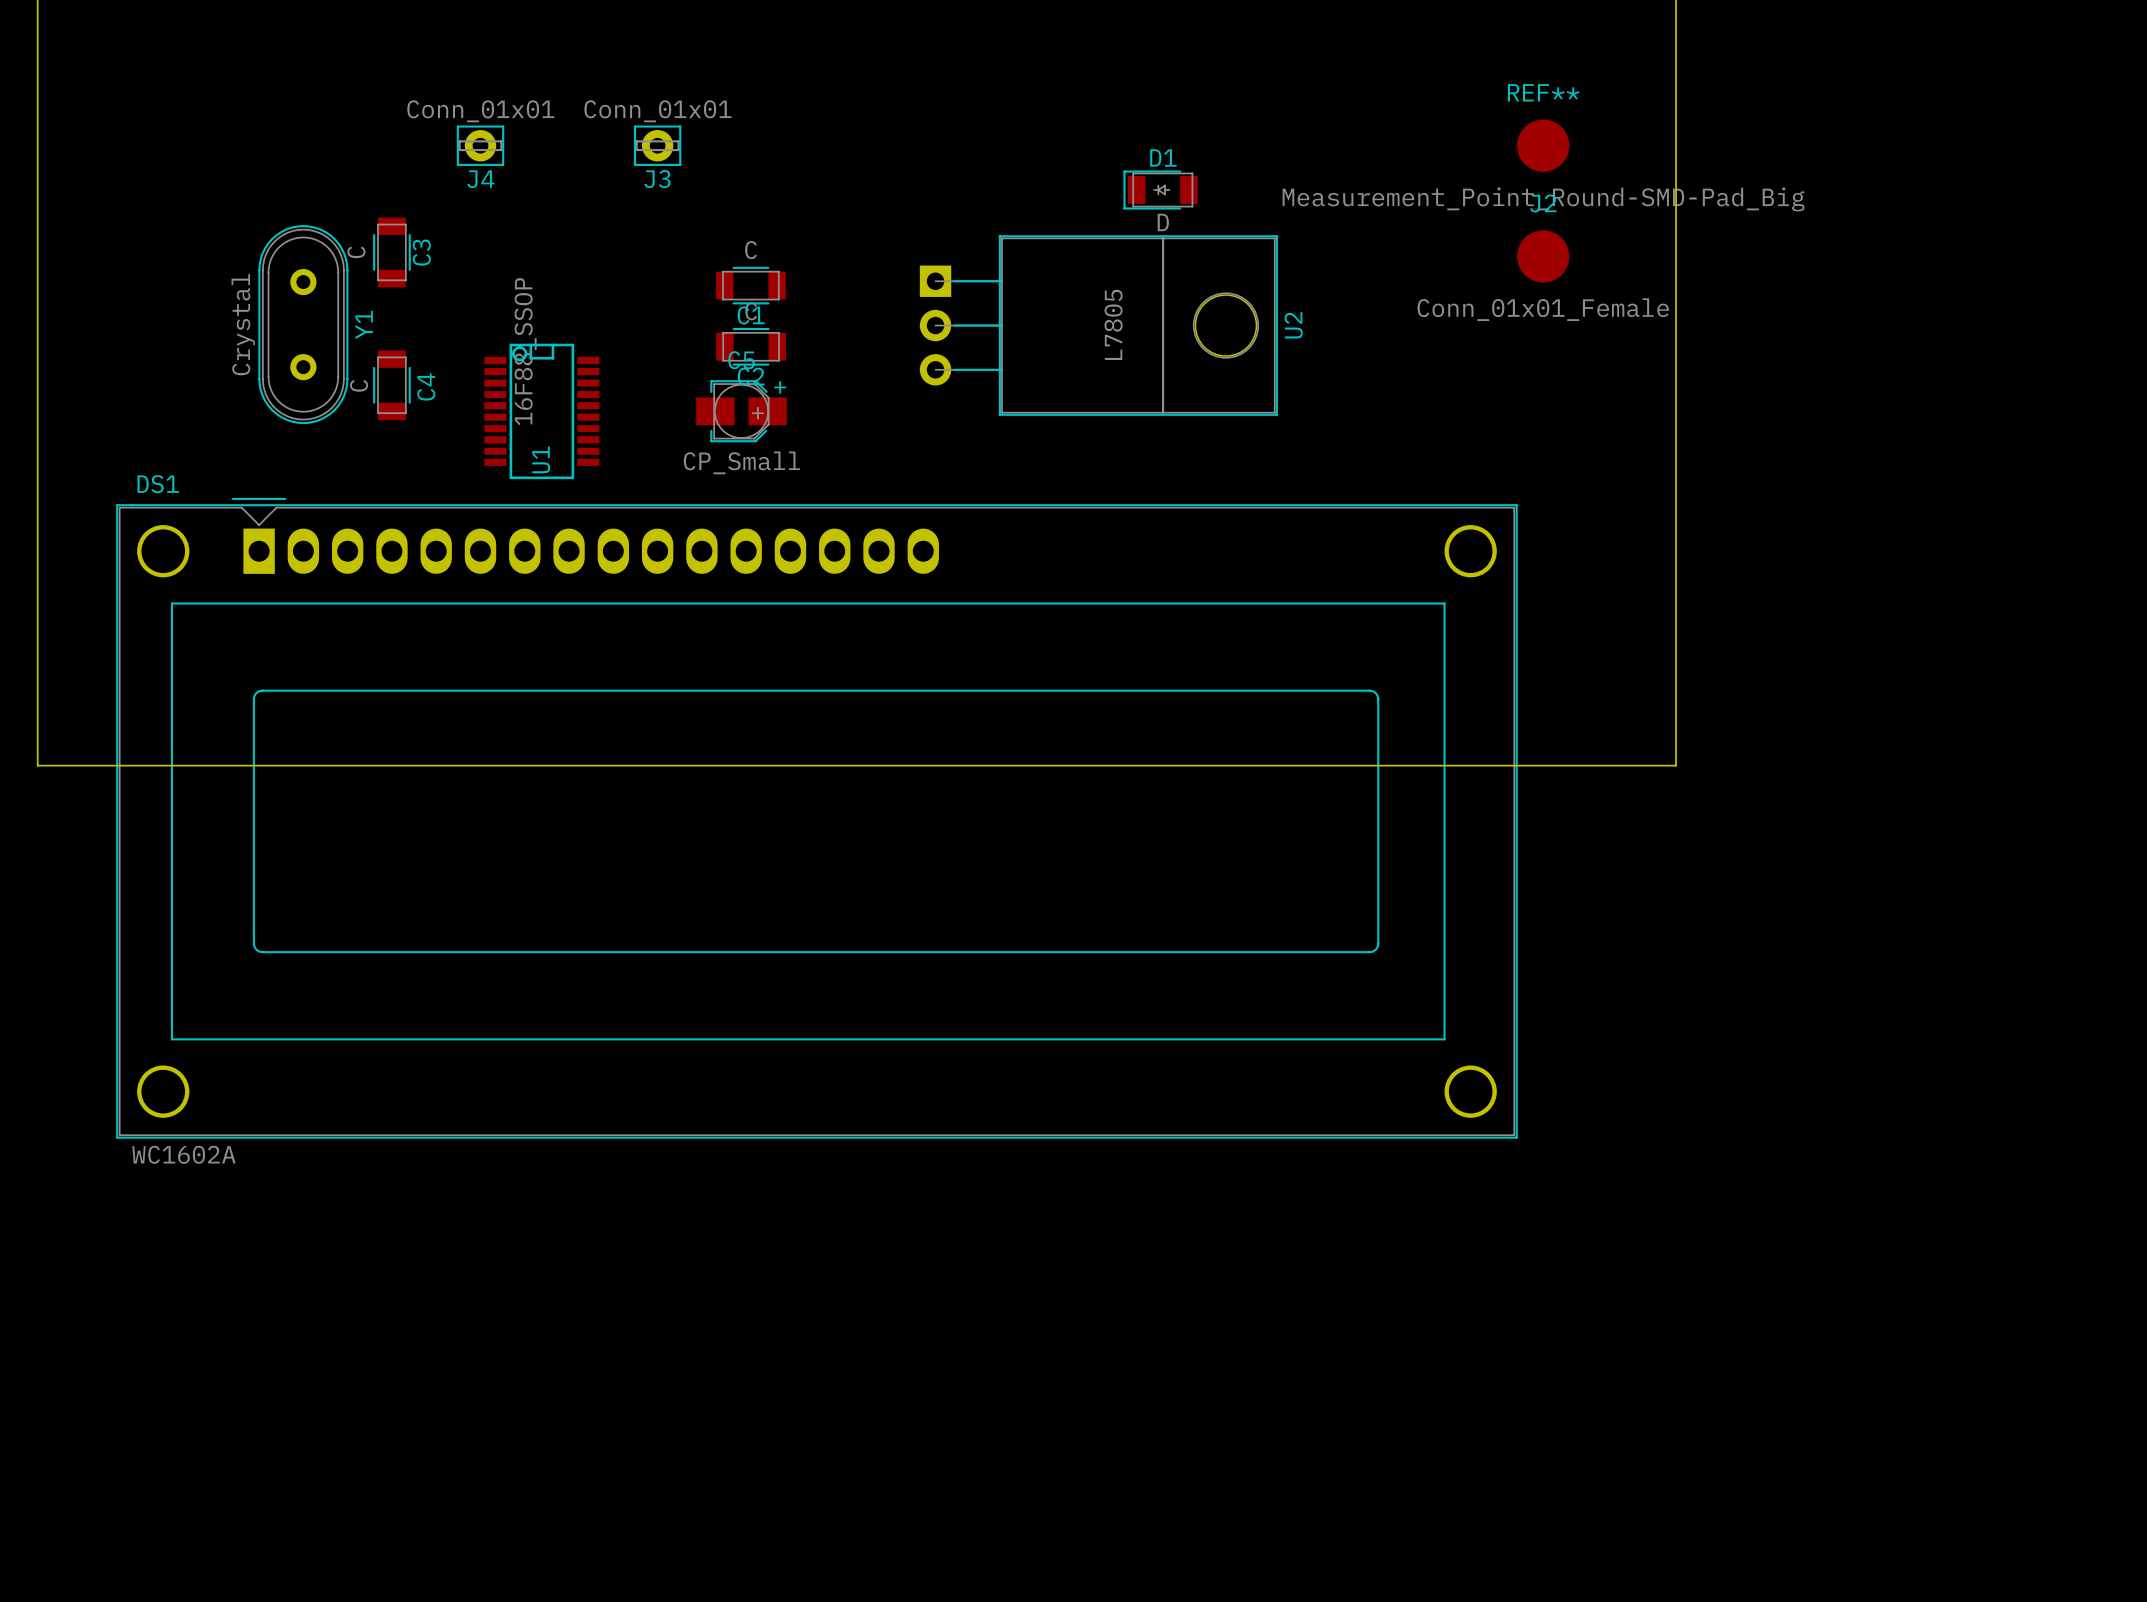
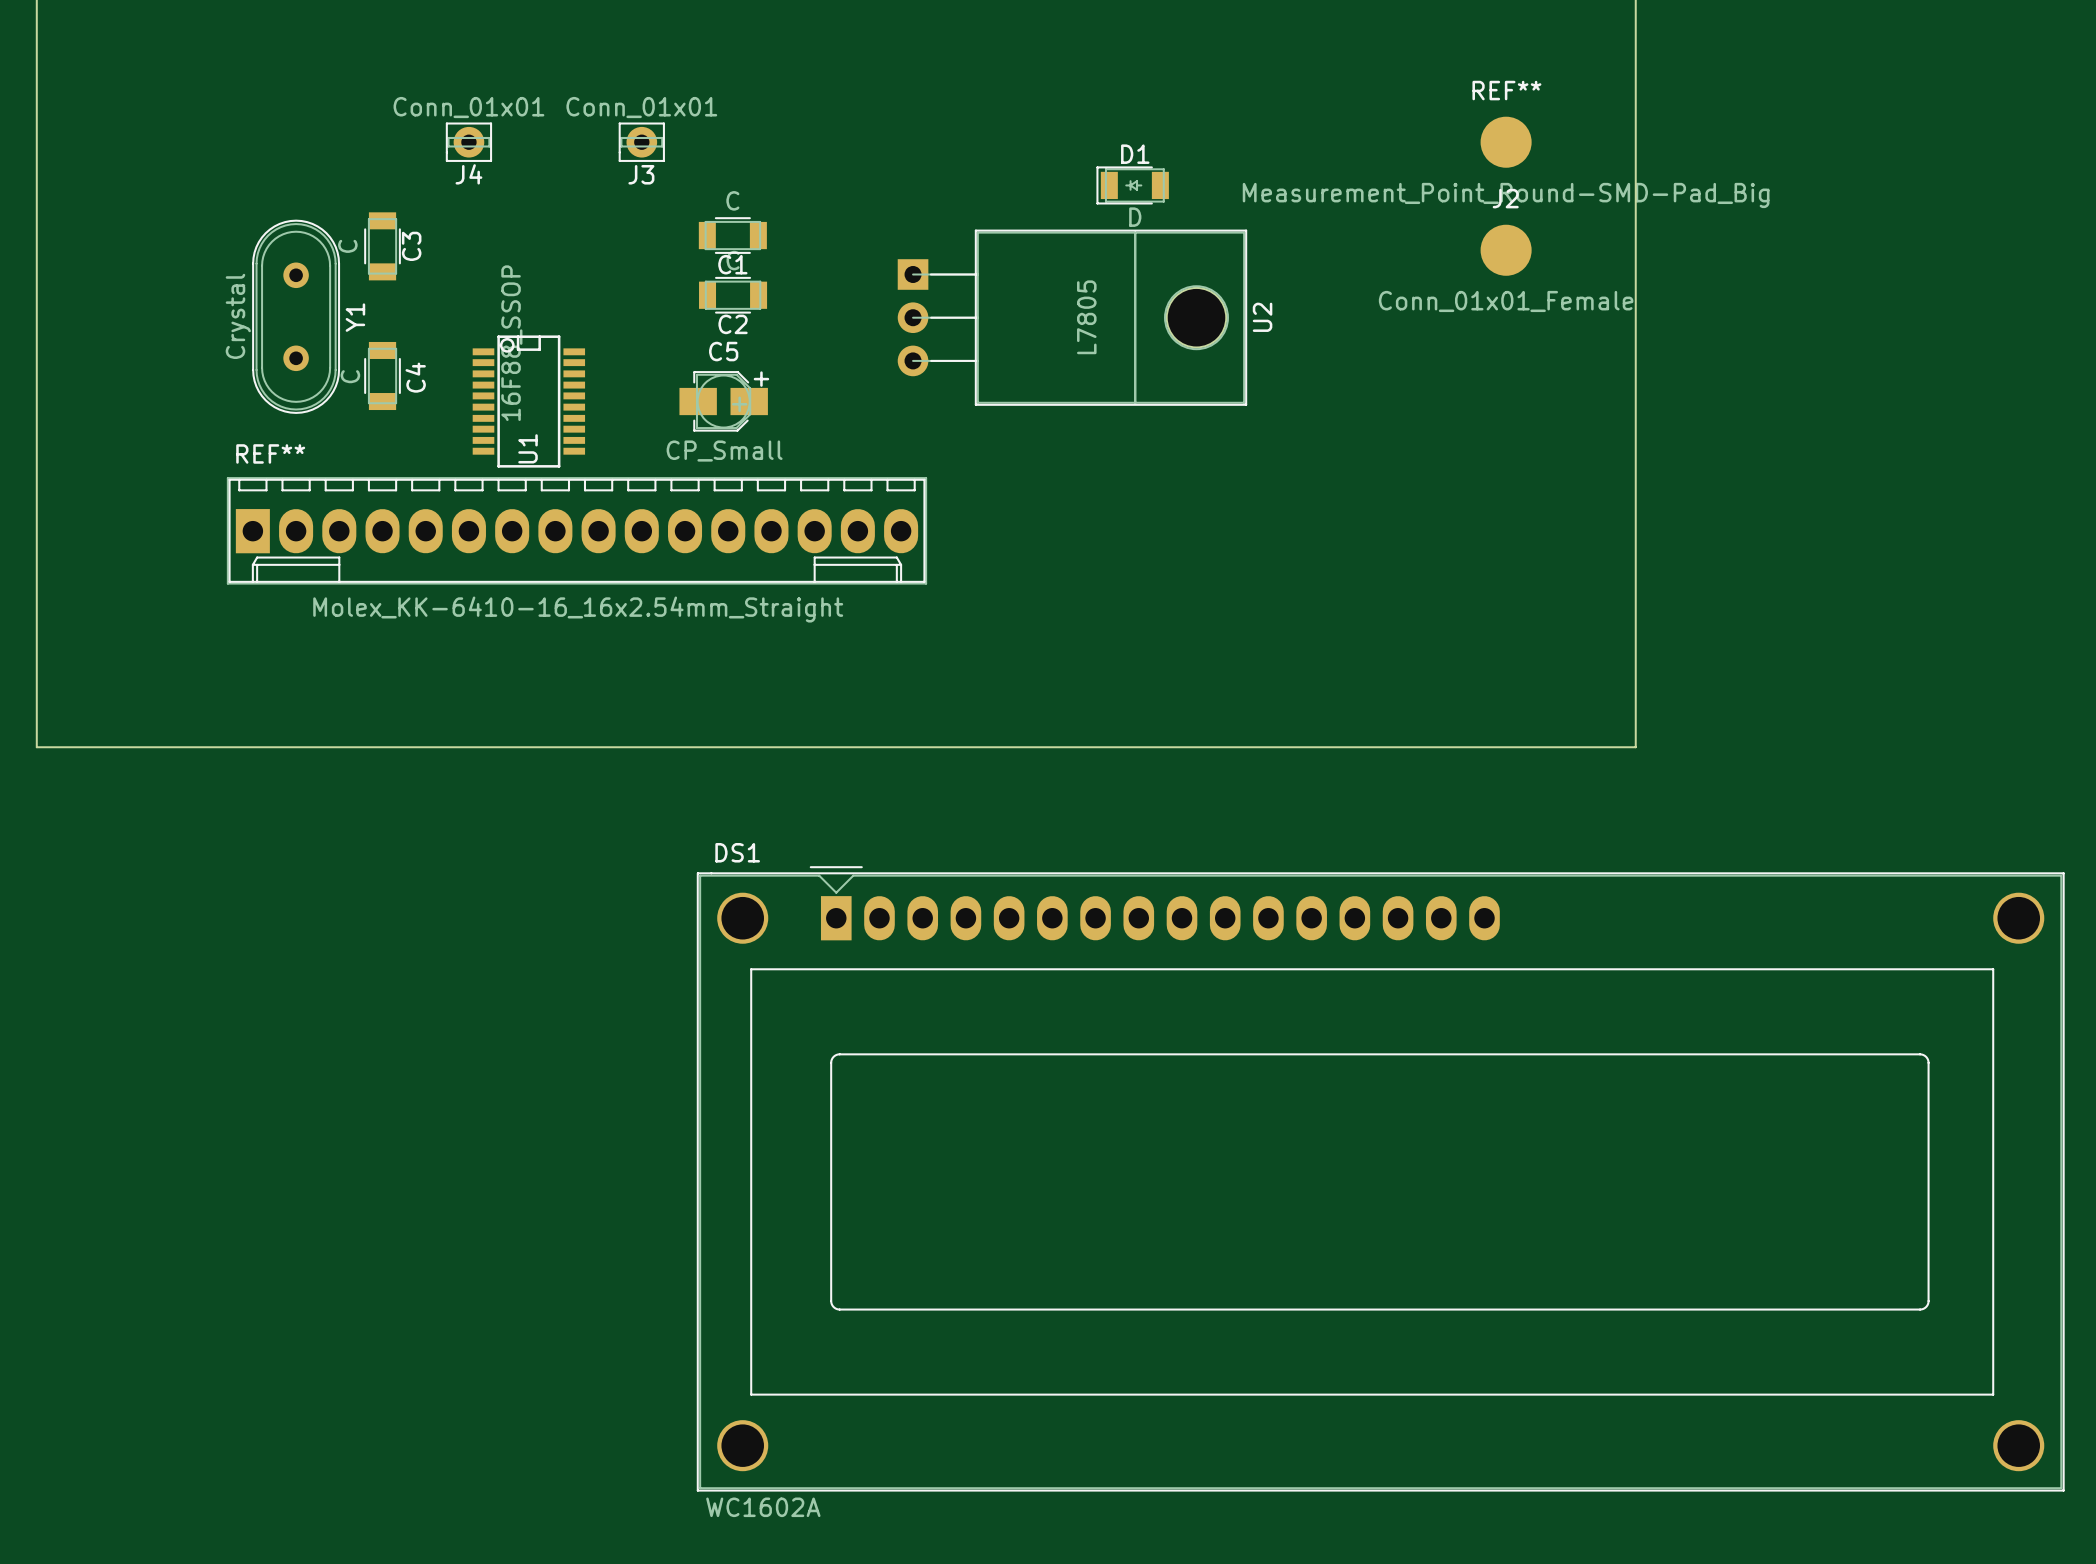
C1 position: (750, 285) -> (732, 235)
C2 position: (751, 346) -> (733, 295)
REF**: none -> Molex_KK-6410-16_16x2.54mm_Straight (576, 530)
DS1 position: (816, 818) -> (1380, 1178)

